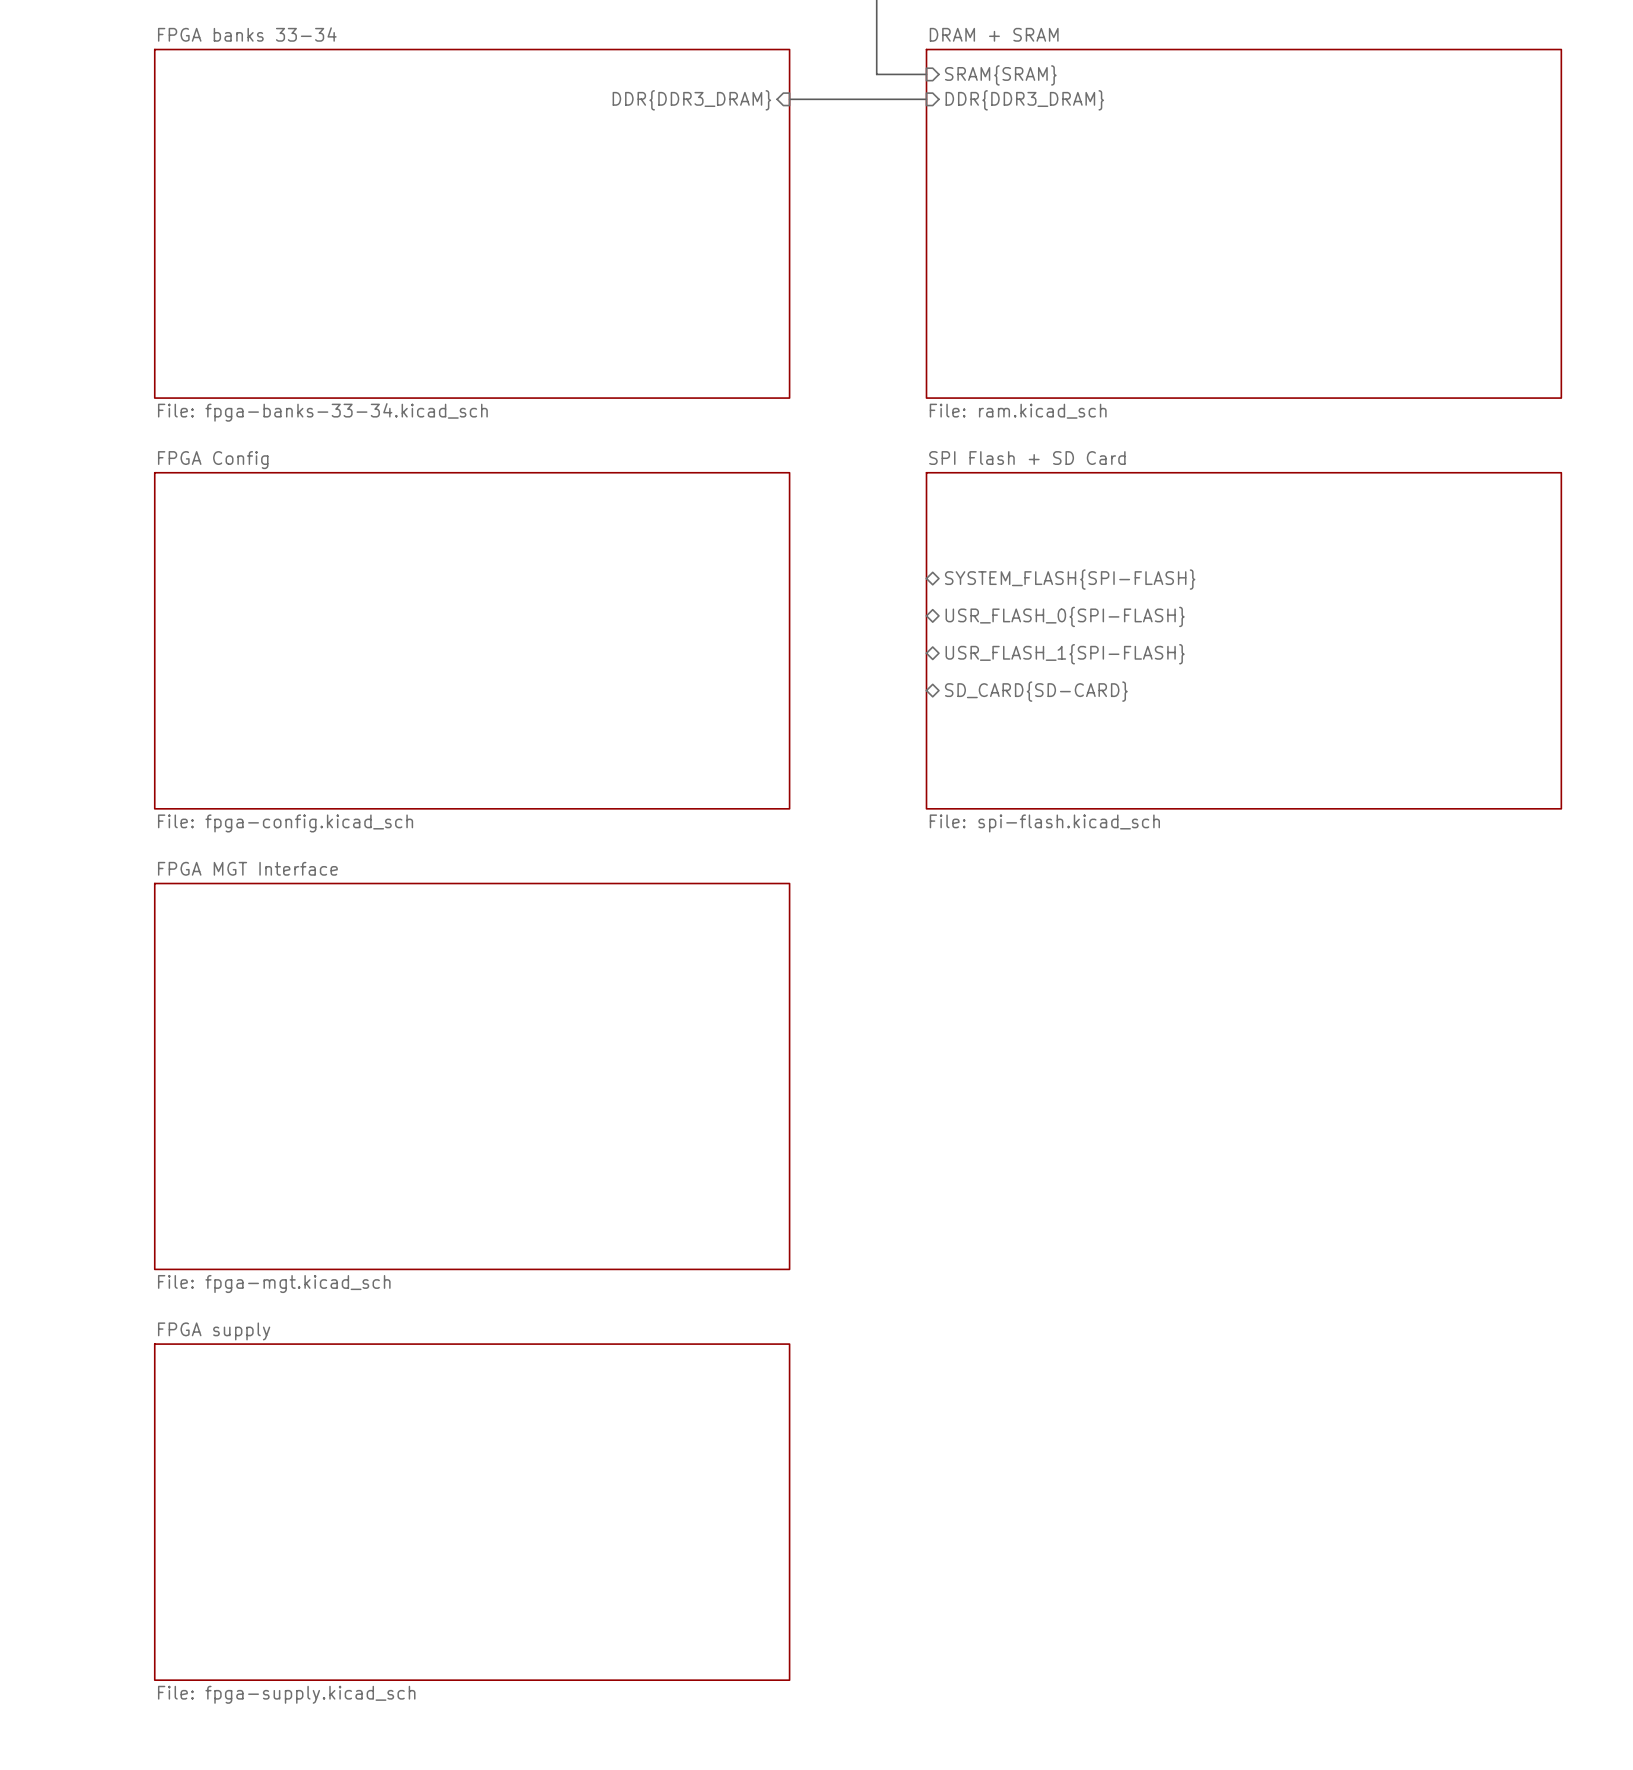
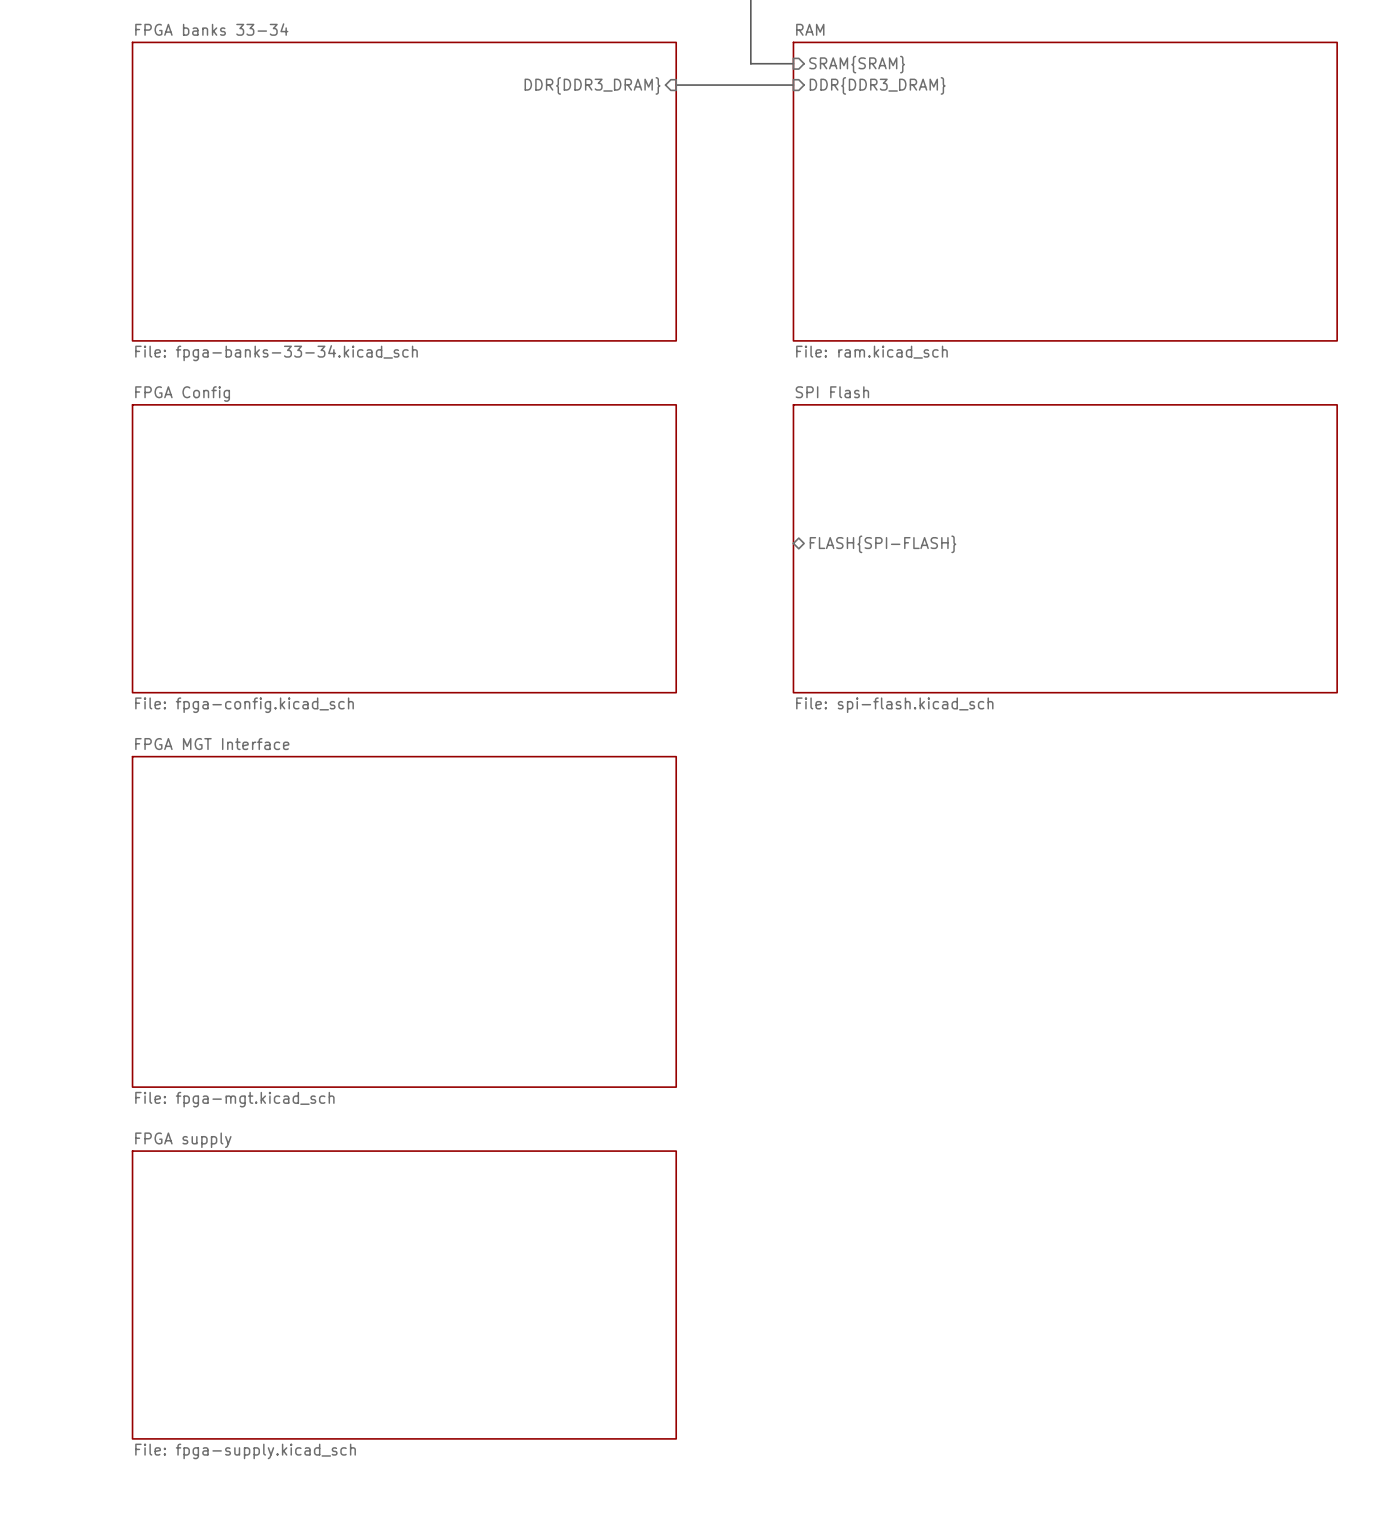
sheet DRAM + SRAM name: DRAM + SRAM (994, 34) -> RAM (810, 29)
sheet SPI Flash + SD Card name: SPI Flash + SD Card (1027, 458) -> SPI Flash (832, 392)
sheet pin: SYSTEM_FLASH{SPI-FLASH} (1070, 579) -> none
sheet pin: USR_FLASH_0{SPI-FLASH} (1065, 616) -> none
sheet pin: none -> FLASH{SPI-FLASH} (882, 544)
sheet pin: USR_FLASH_1{SPI-FLASH} (1065, 654) -> none
sheet pin: SD_CARD{SD-CARD} (1036, 691) -> none

